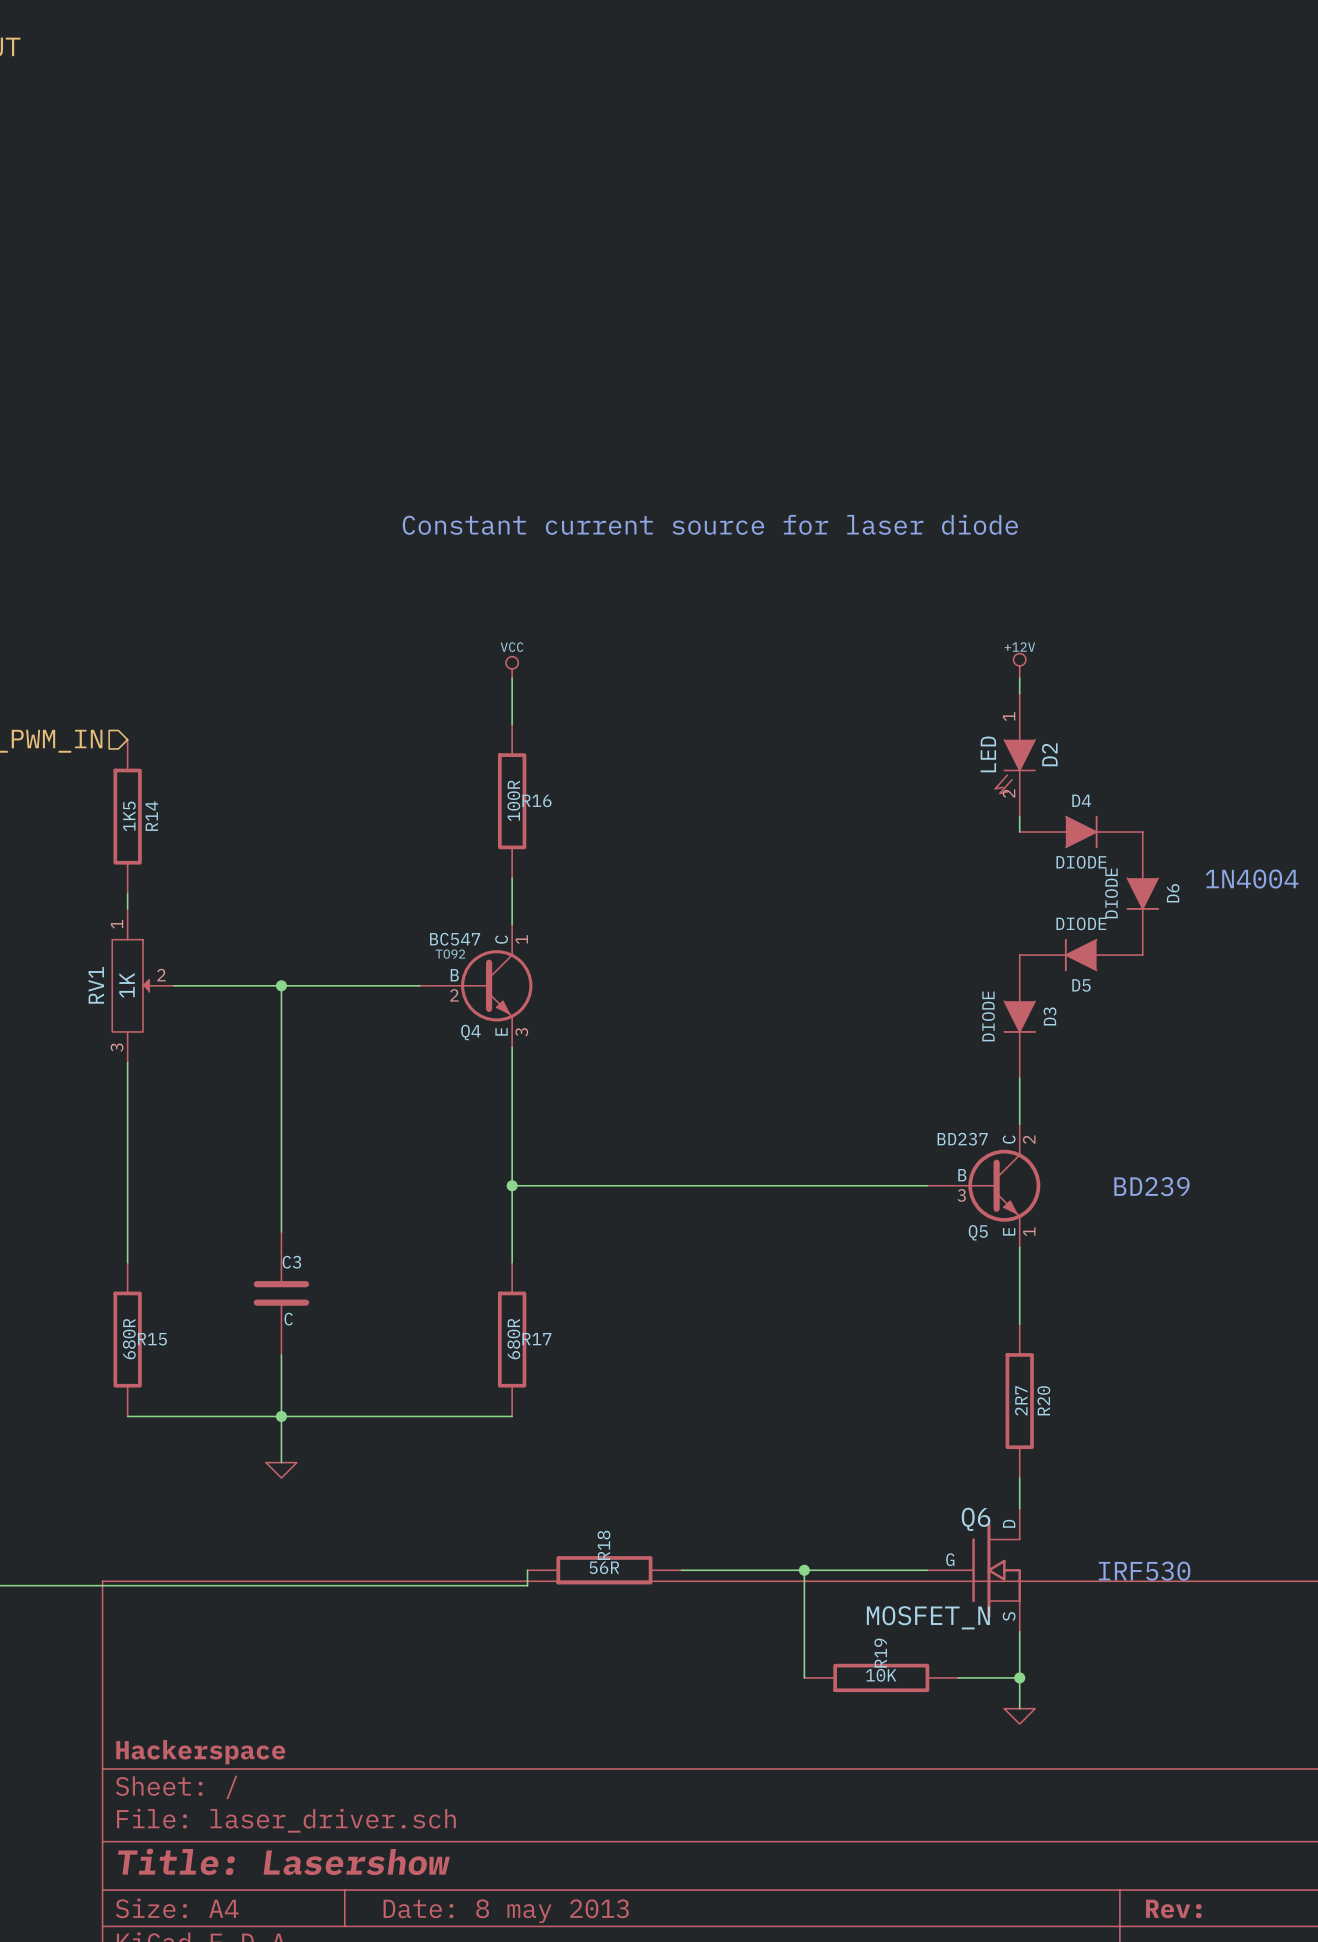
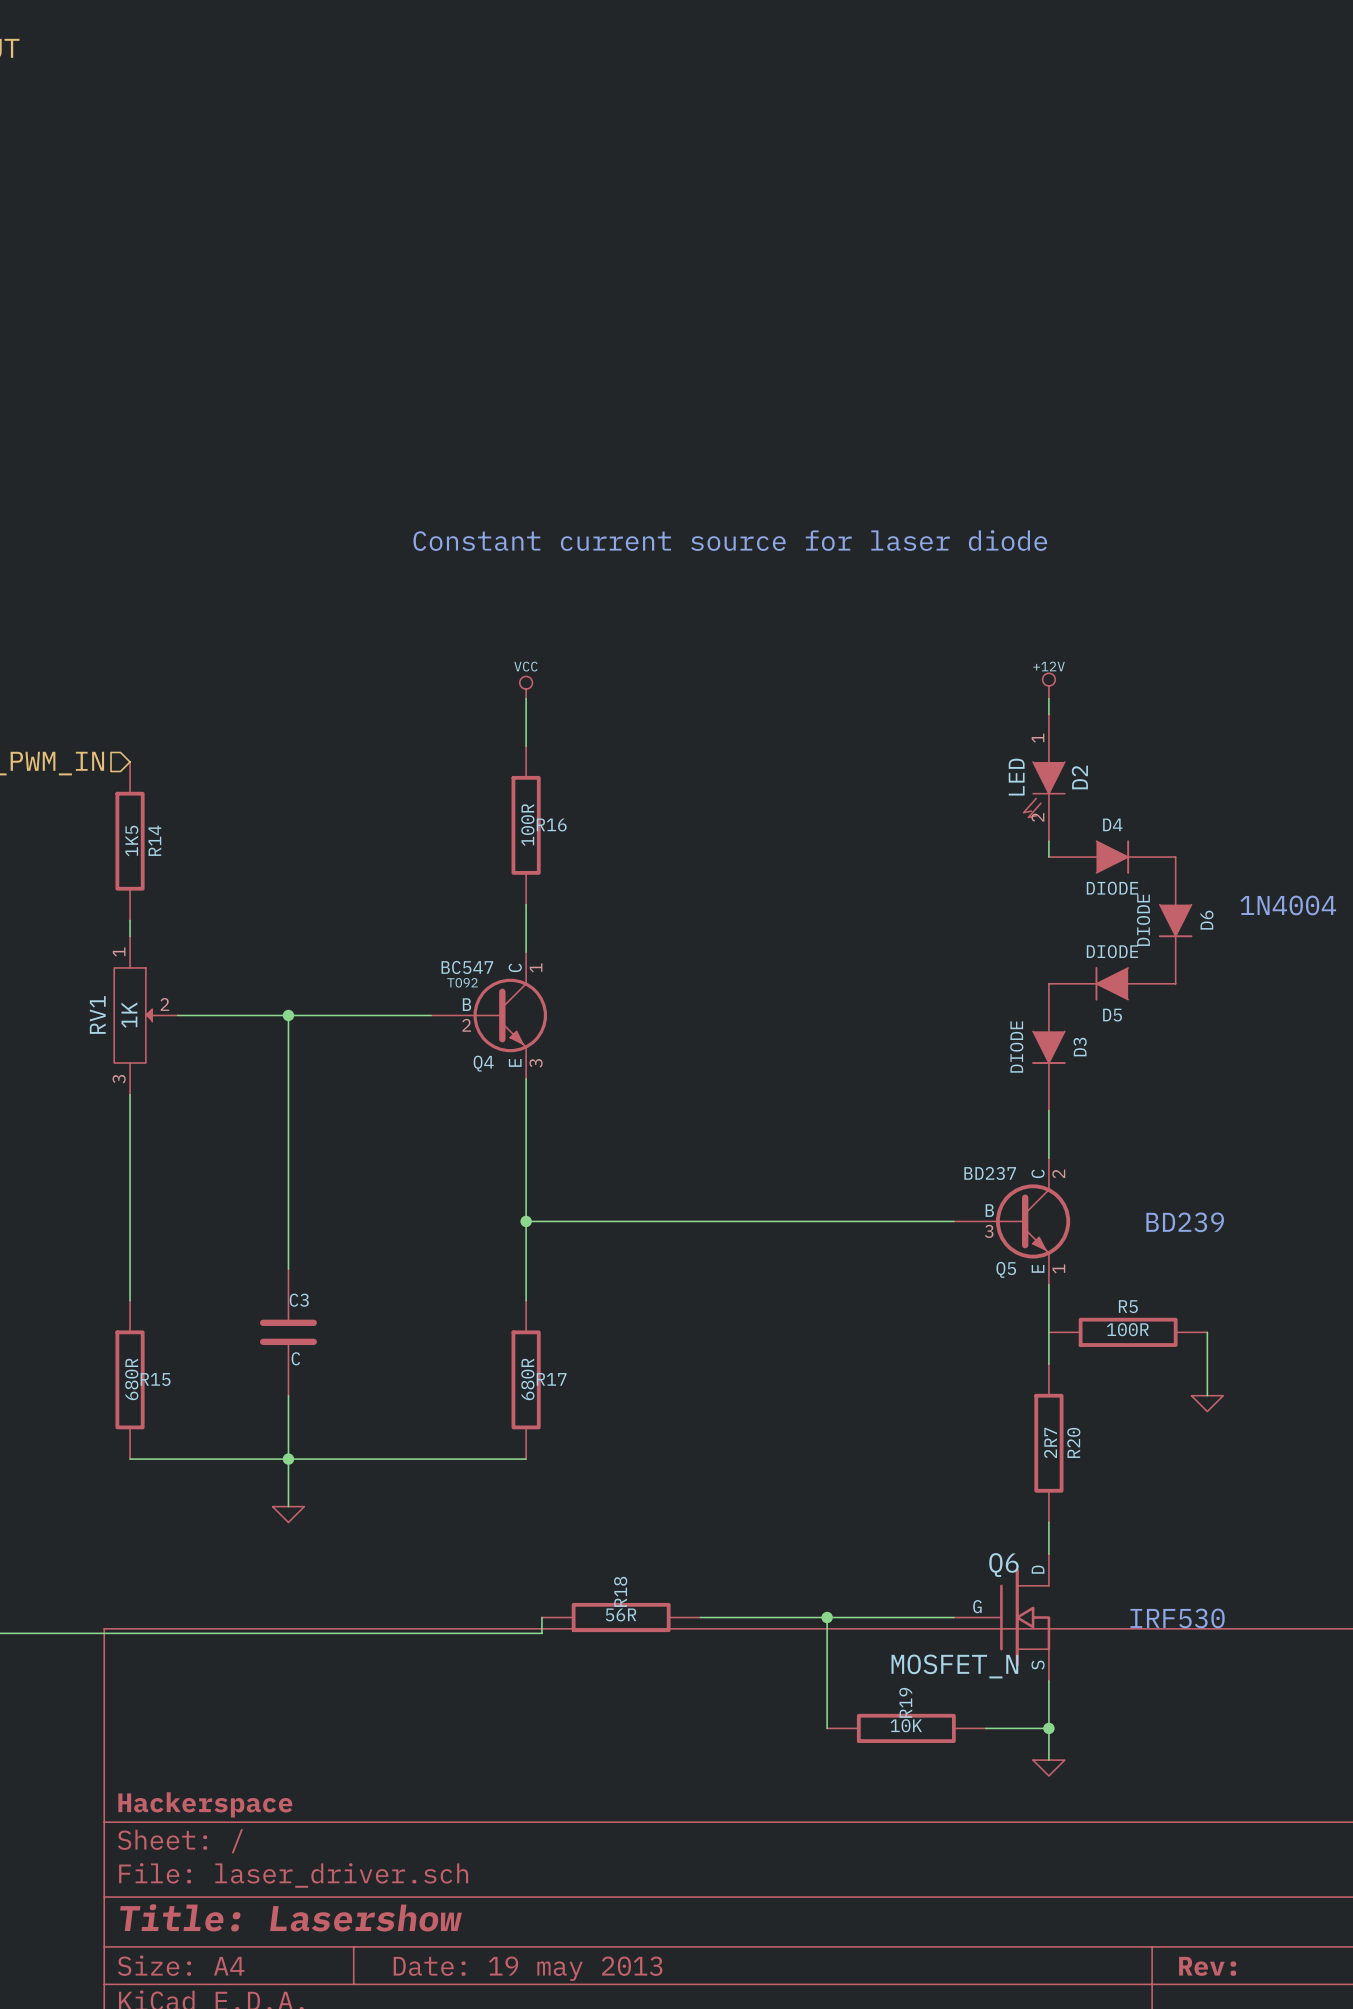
R5: none -> 100R (1128, 1332)
wire: none -> (1207, 1332) (1207, 1395)
power symbol: none -> (1207, 1403)
title block: Date: 8 may 2013 (506, 1911) -> Date: 19 may 2013 (528, 1968)

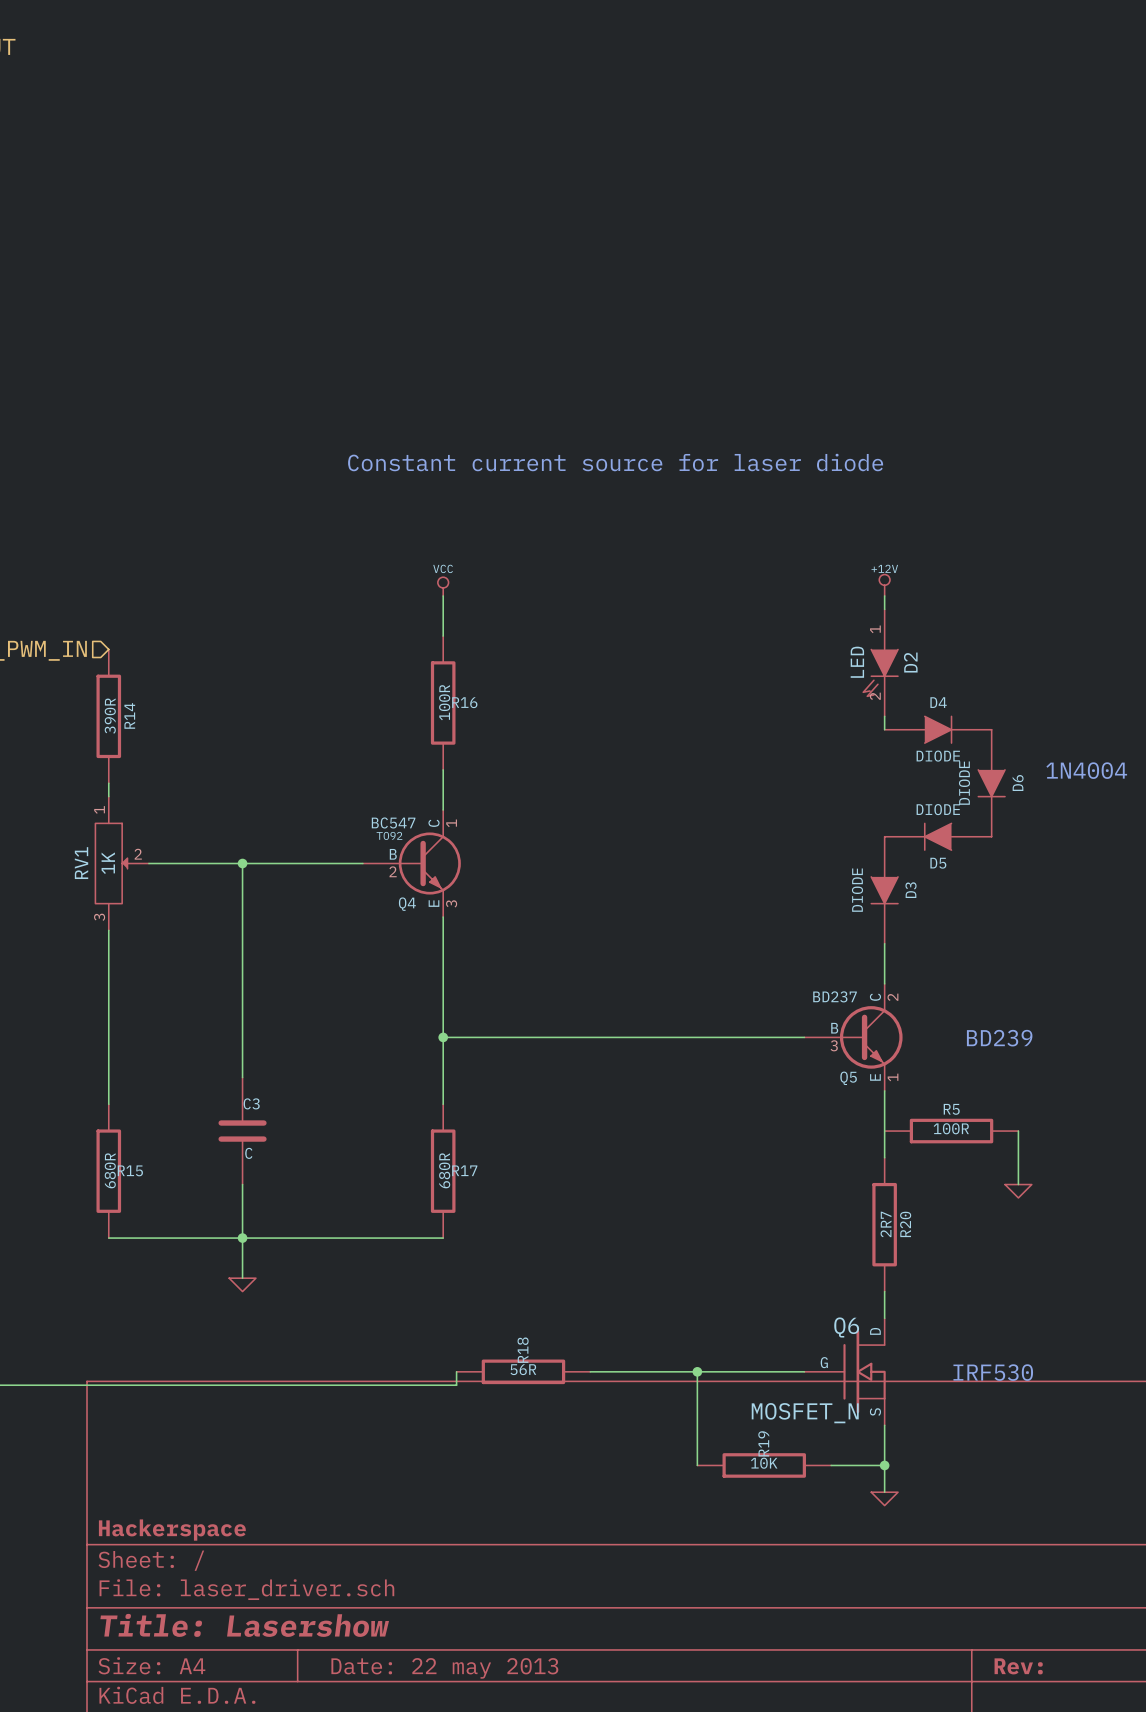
R14 value: 1K5 (131, 841) -> 390R (110, 716)
title block: Date: 19 may 2013 (528, 1968) -> Date: 22 may 2013 (444, 1668)

